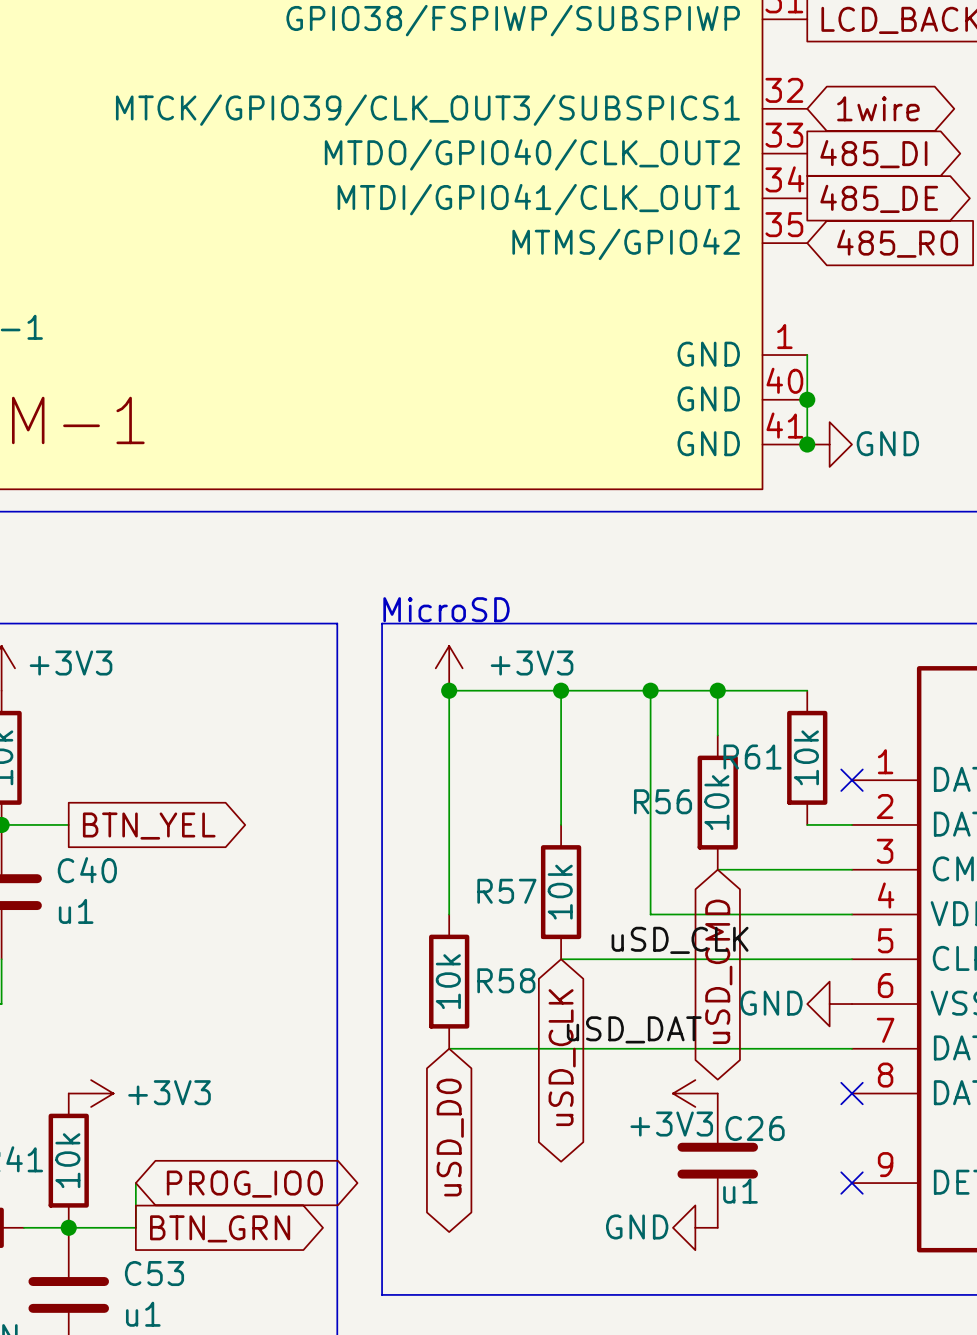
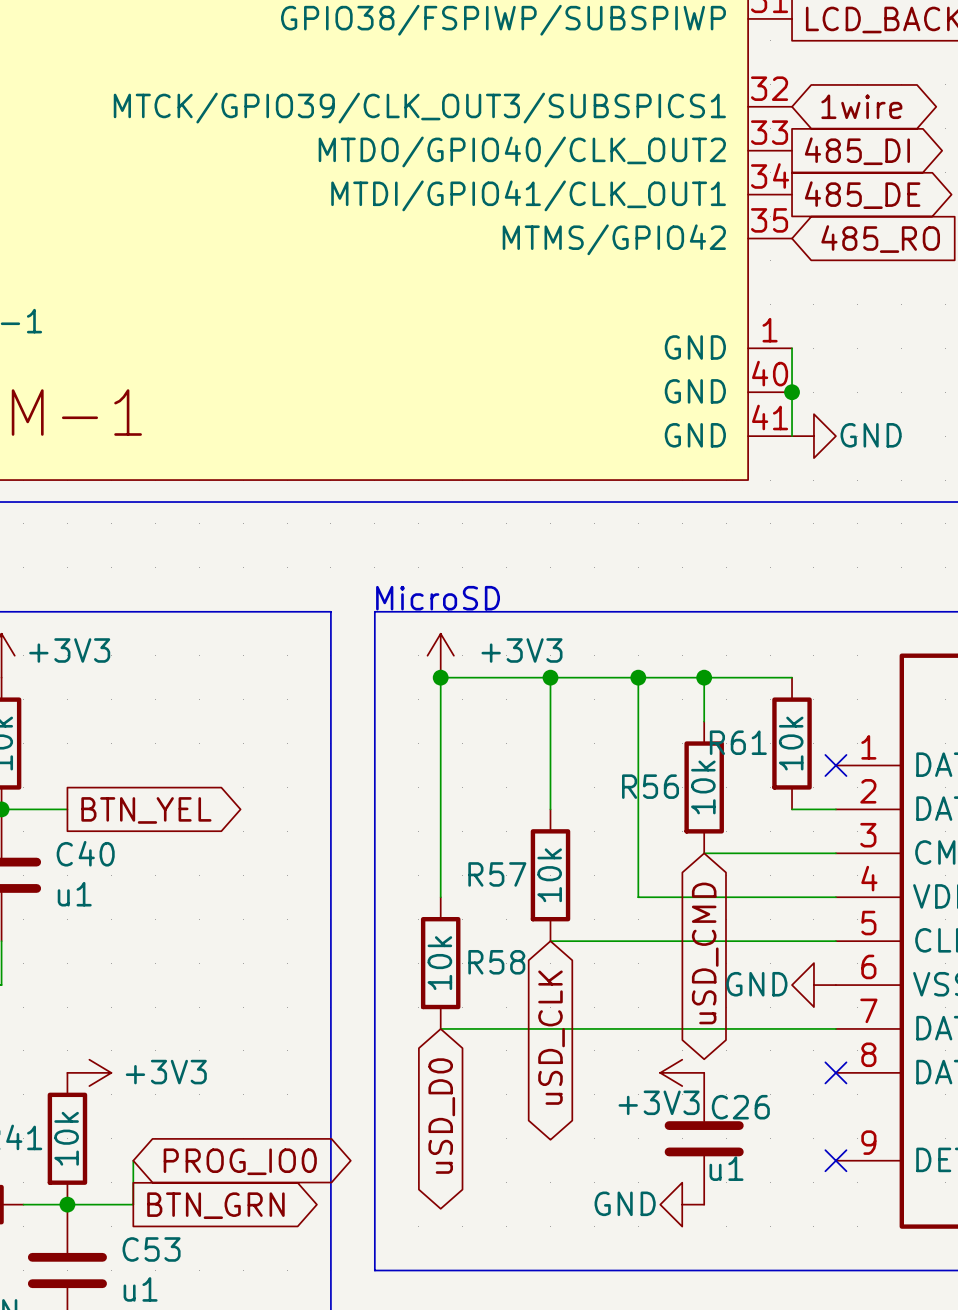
junction: (807, 444) -> none
label: uSD_CLK (680, 940) -> none
label: uSD_DAT (634, 1029) -> none

